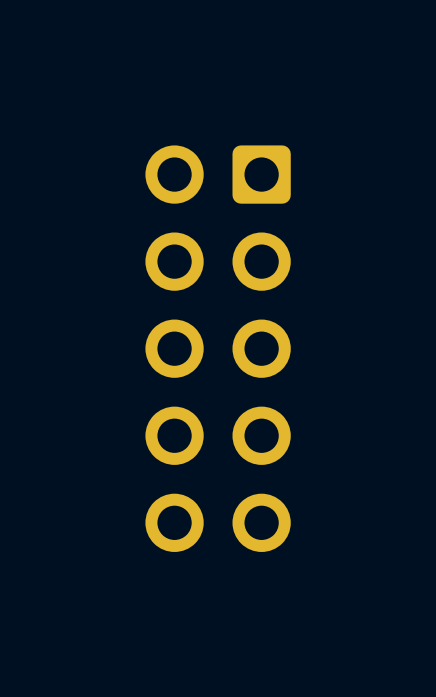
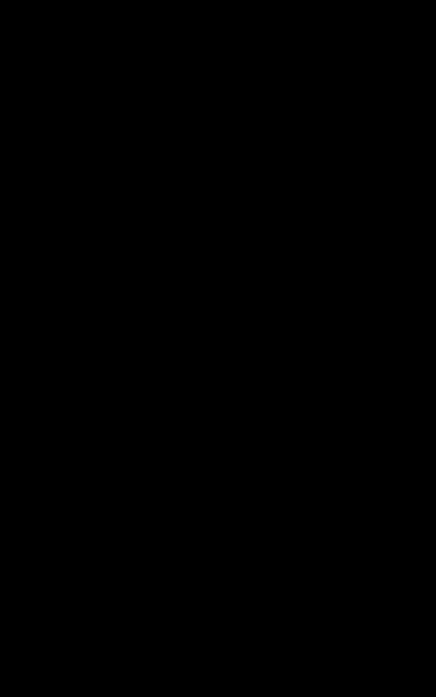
part: (218, 348) -> none

